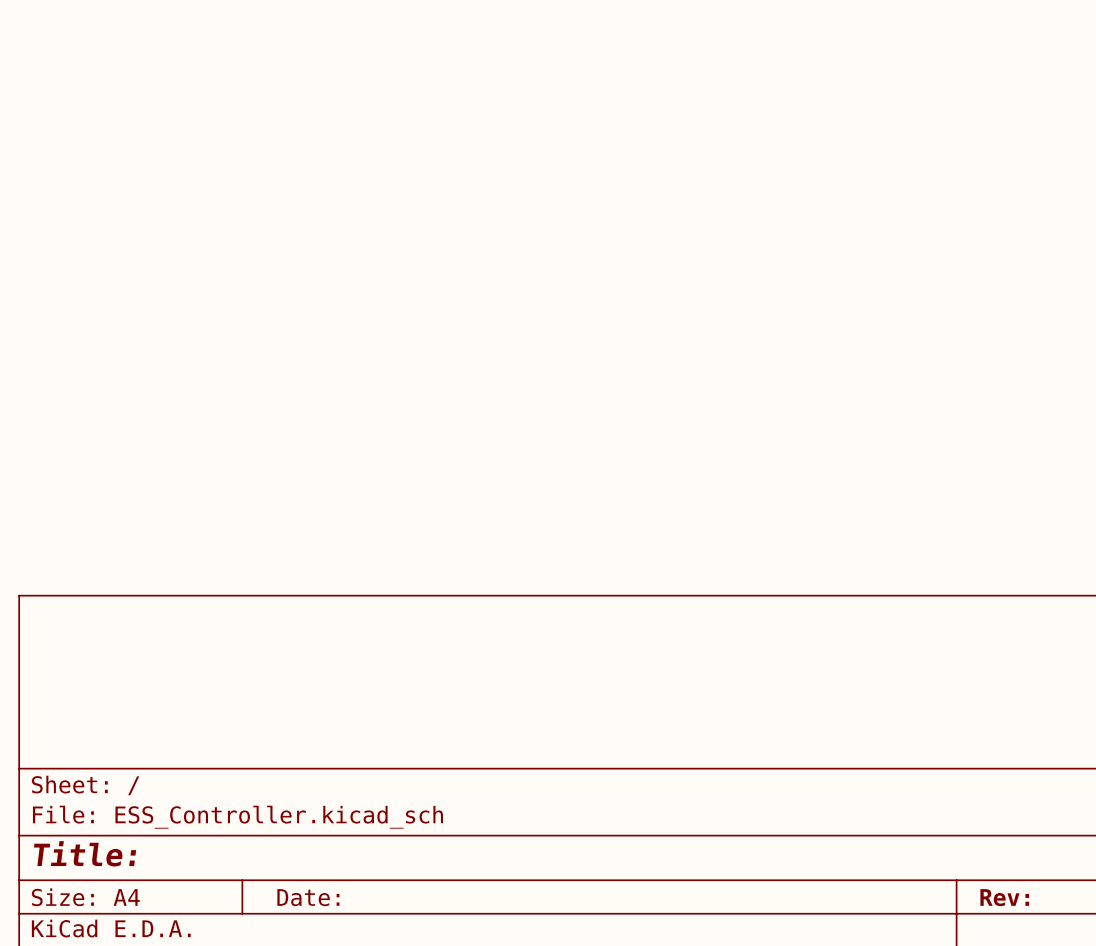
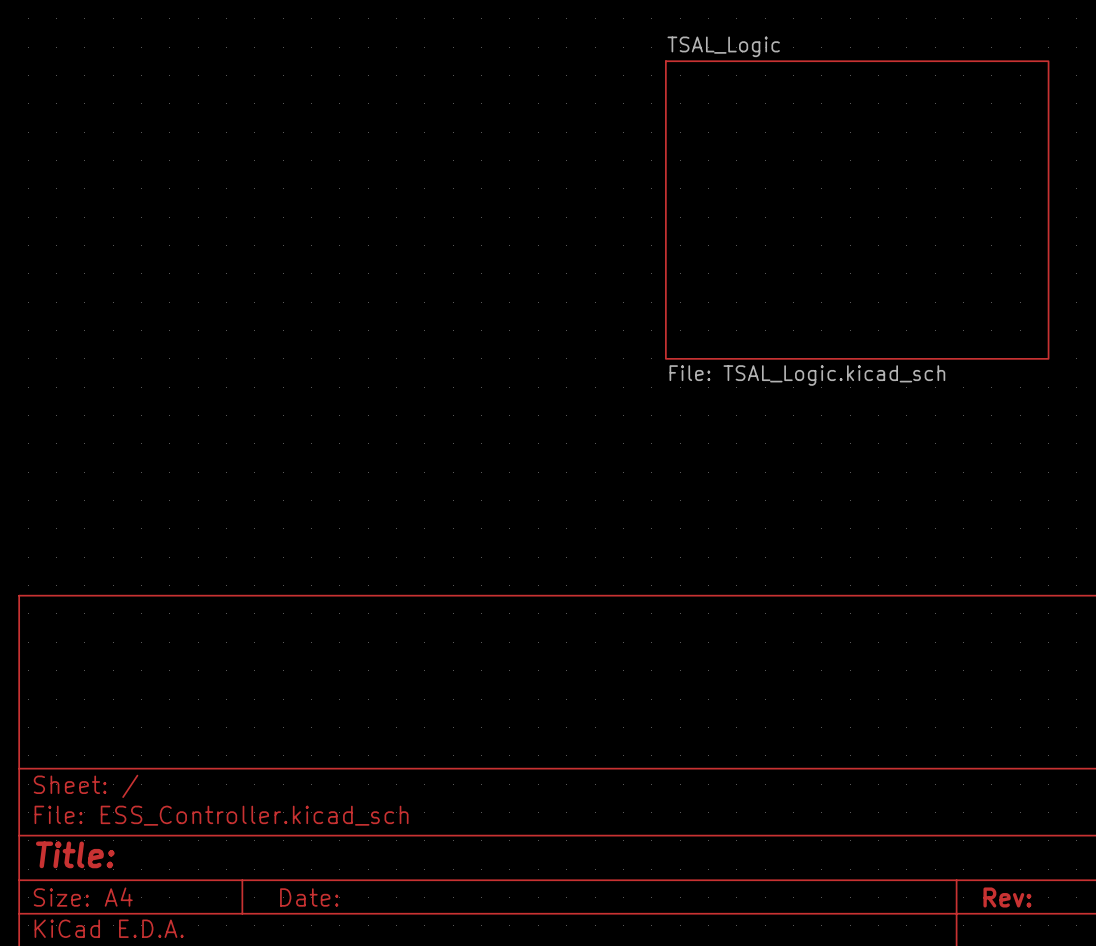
sheet TSAL_Logic: none -> File: TSAL_Logic.kicad_sch (857, 210)

